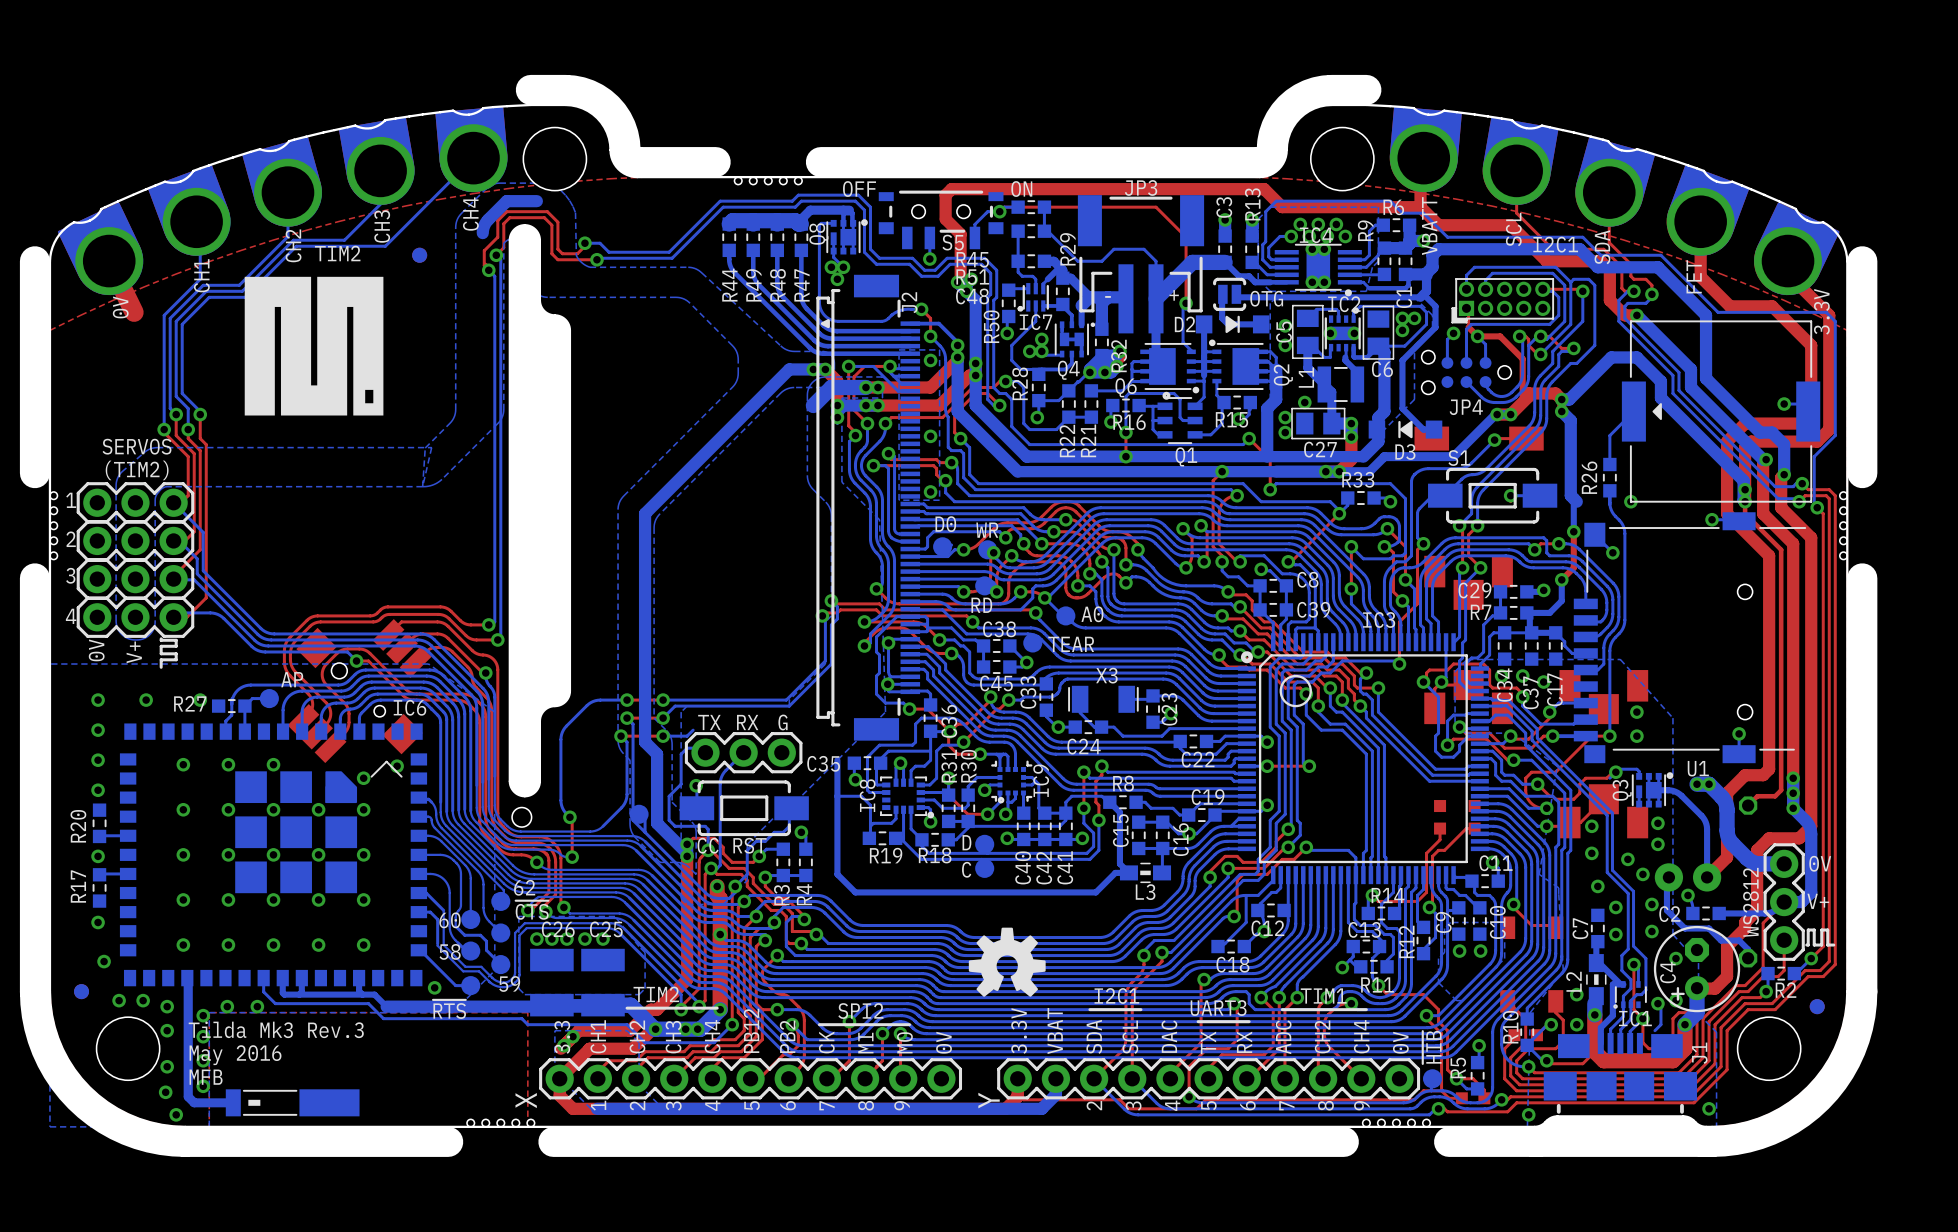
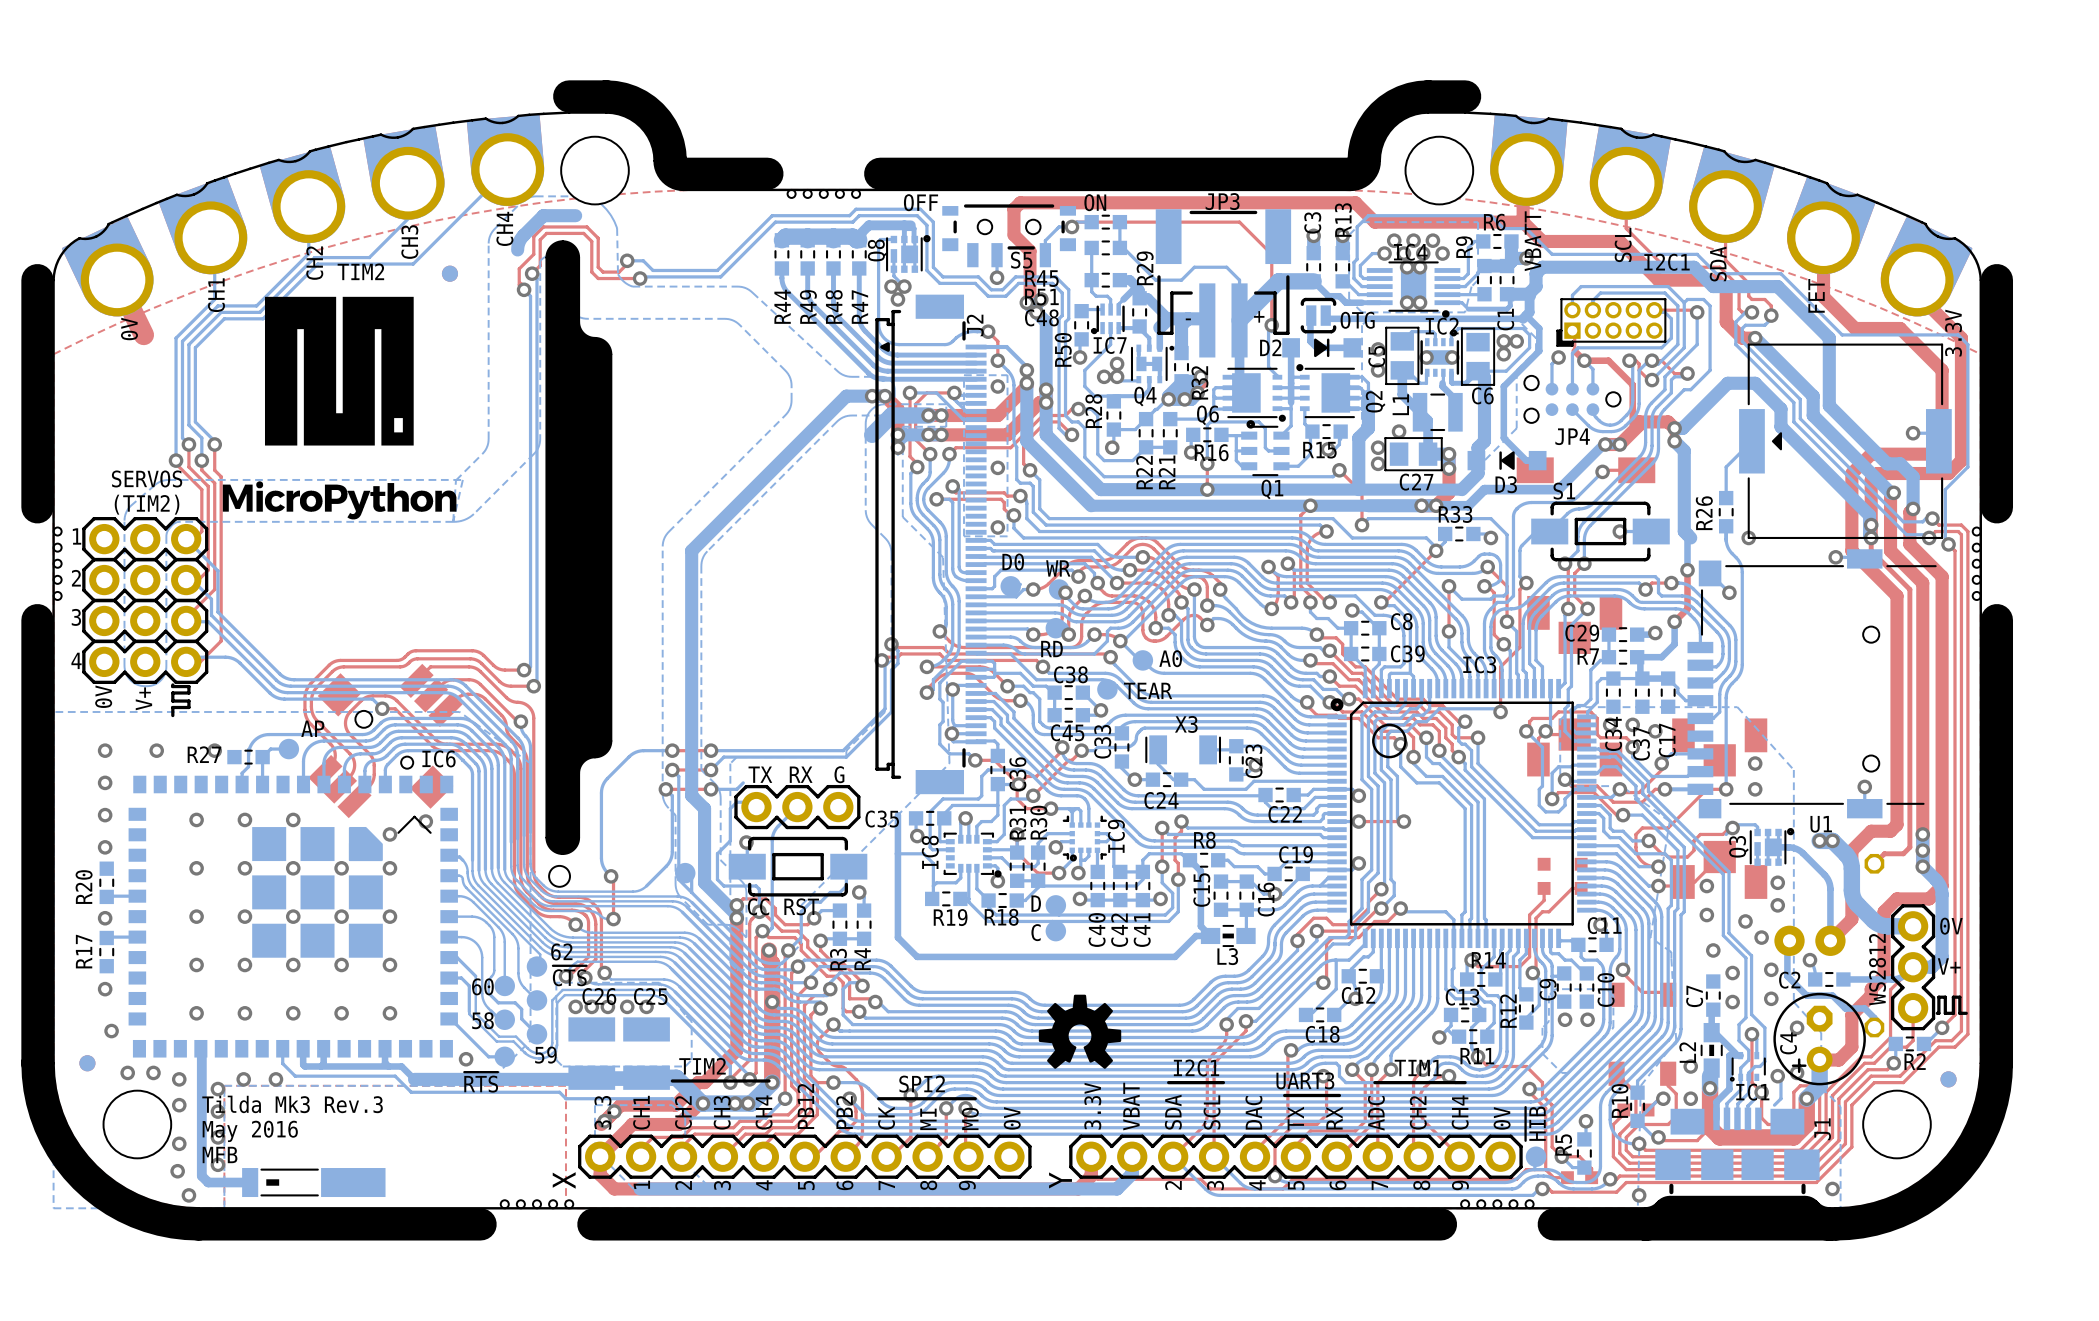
drawing: none -> [222, 296, 457, 520]
drawing: [244, 276, 384, 416] -> none

